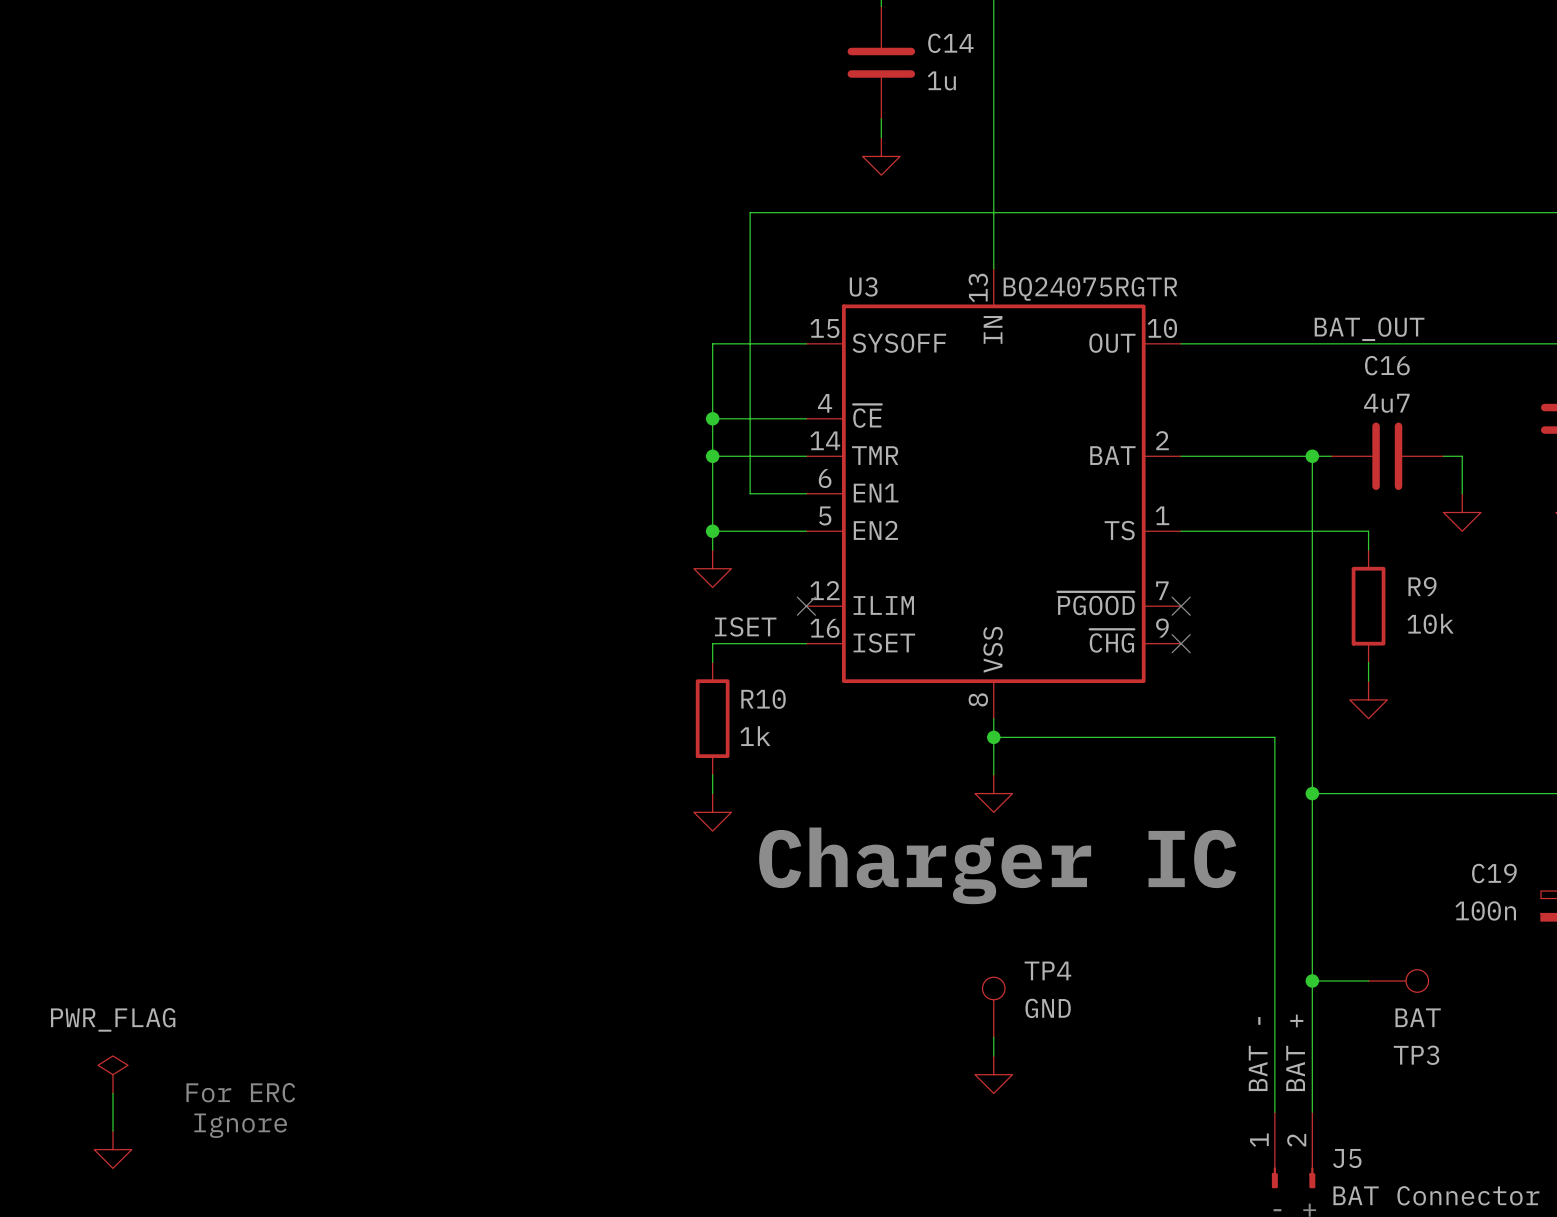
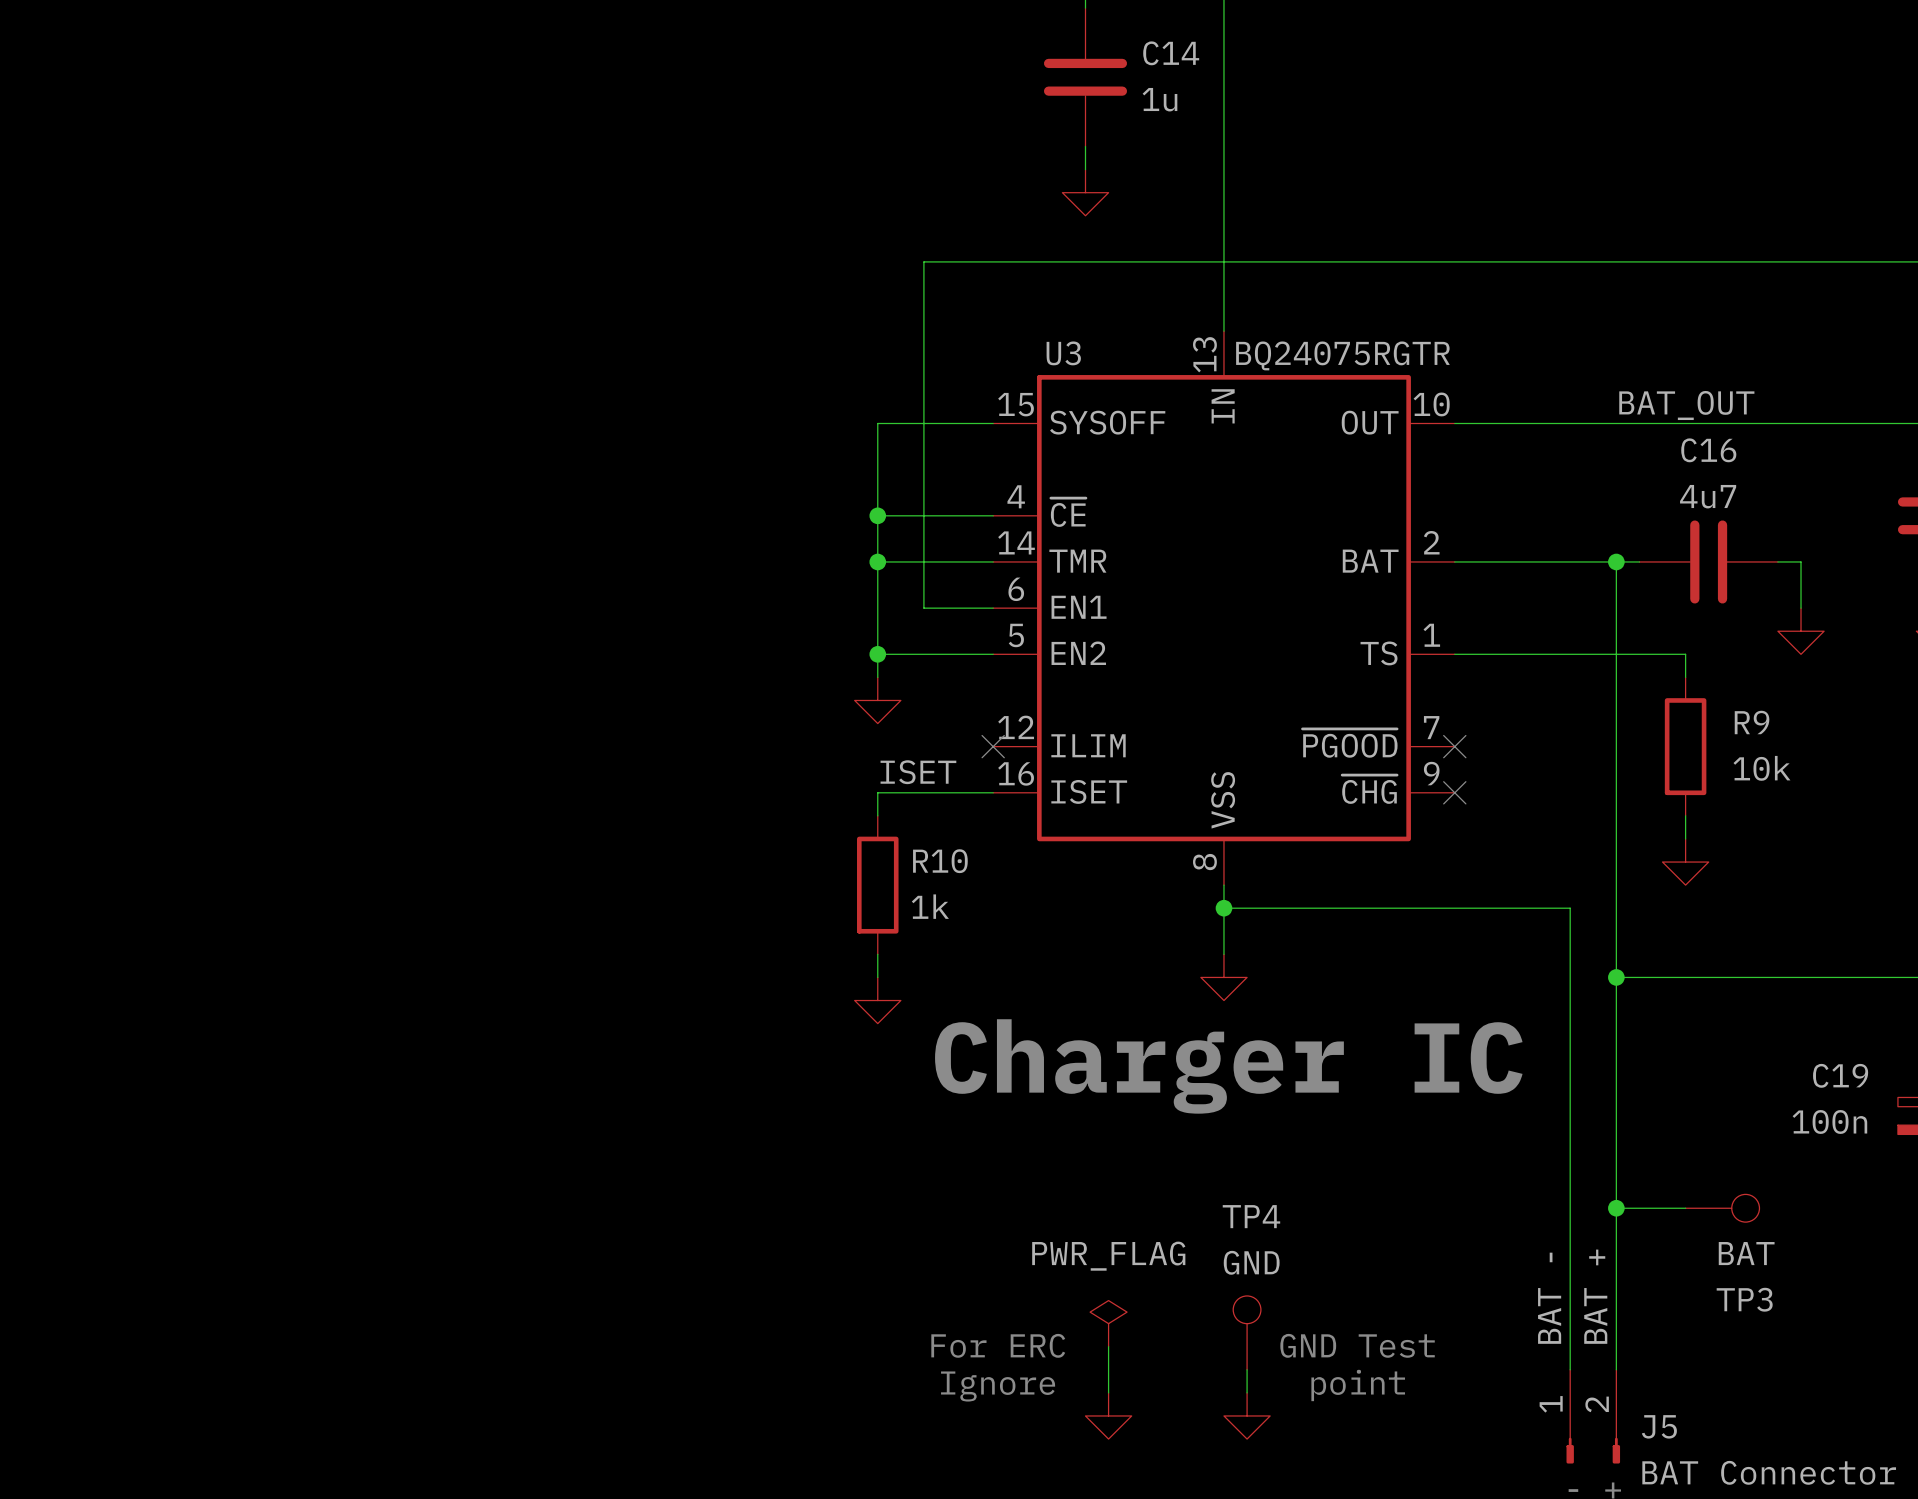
TP4 name position: TP4 (1047, 970) -> TP4 (1251, 1216)
TP4 position: (993, 1007) -> (1247, 1332)
TP4 value position: GND (1048, 1008) -> GND (1251, 1262)
wire: (993, 1037) (993, 1055) -> (1247, 1369) (1247, 1392)
power symbol: PWR_FLAG (113, 1074) -> none
power symbol: none -> PWR_FLAG (1108, 1323)
power symbol: (993, 1074) -> none
text: For ERC (240, 1092) -> none
text: none -> For ERC (998, 1345)
text: none -> GND Test (1357, 1345)
wire: (113, 1093) (113, 1130) -> none
wire: none -> (1108, 1346) (1108, 1392)
text: none -> point (1358, 1385)
text: Ignore (240, 1125) -> none
text: none -> Ignore (998, 1386)
power symbol: (113, 1149) -> none
power symbol: none -> (1108, 1415)
power symbol: none -> (1247, 1415)

